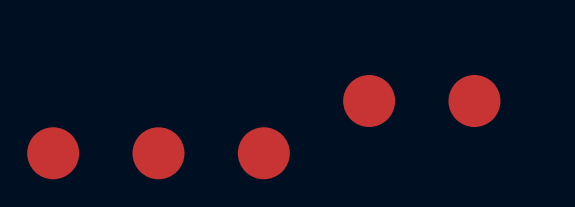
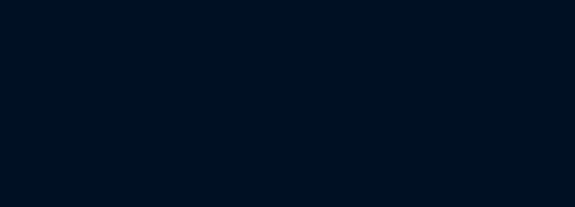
part: (369, 101) -> none
part: (474, 101) -> none
part: (53, 153) -> none
part: (158, 153) -> none
part: (263, 153) -> none

